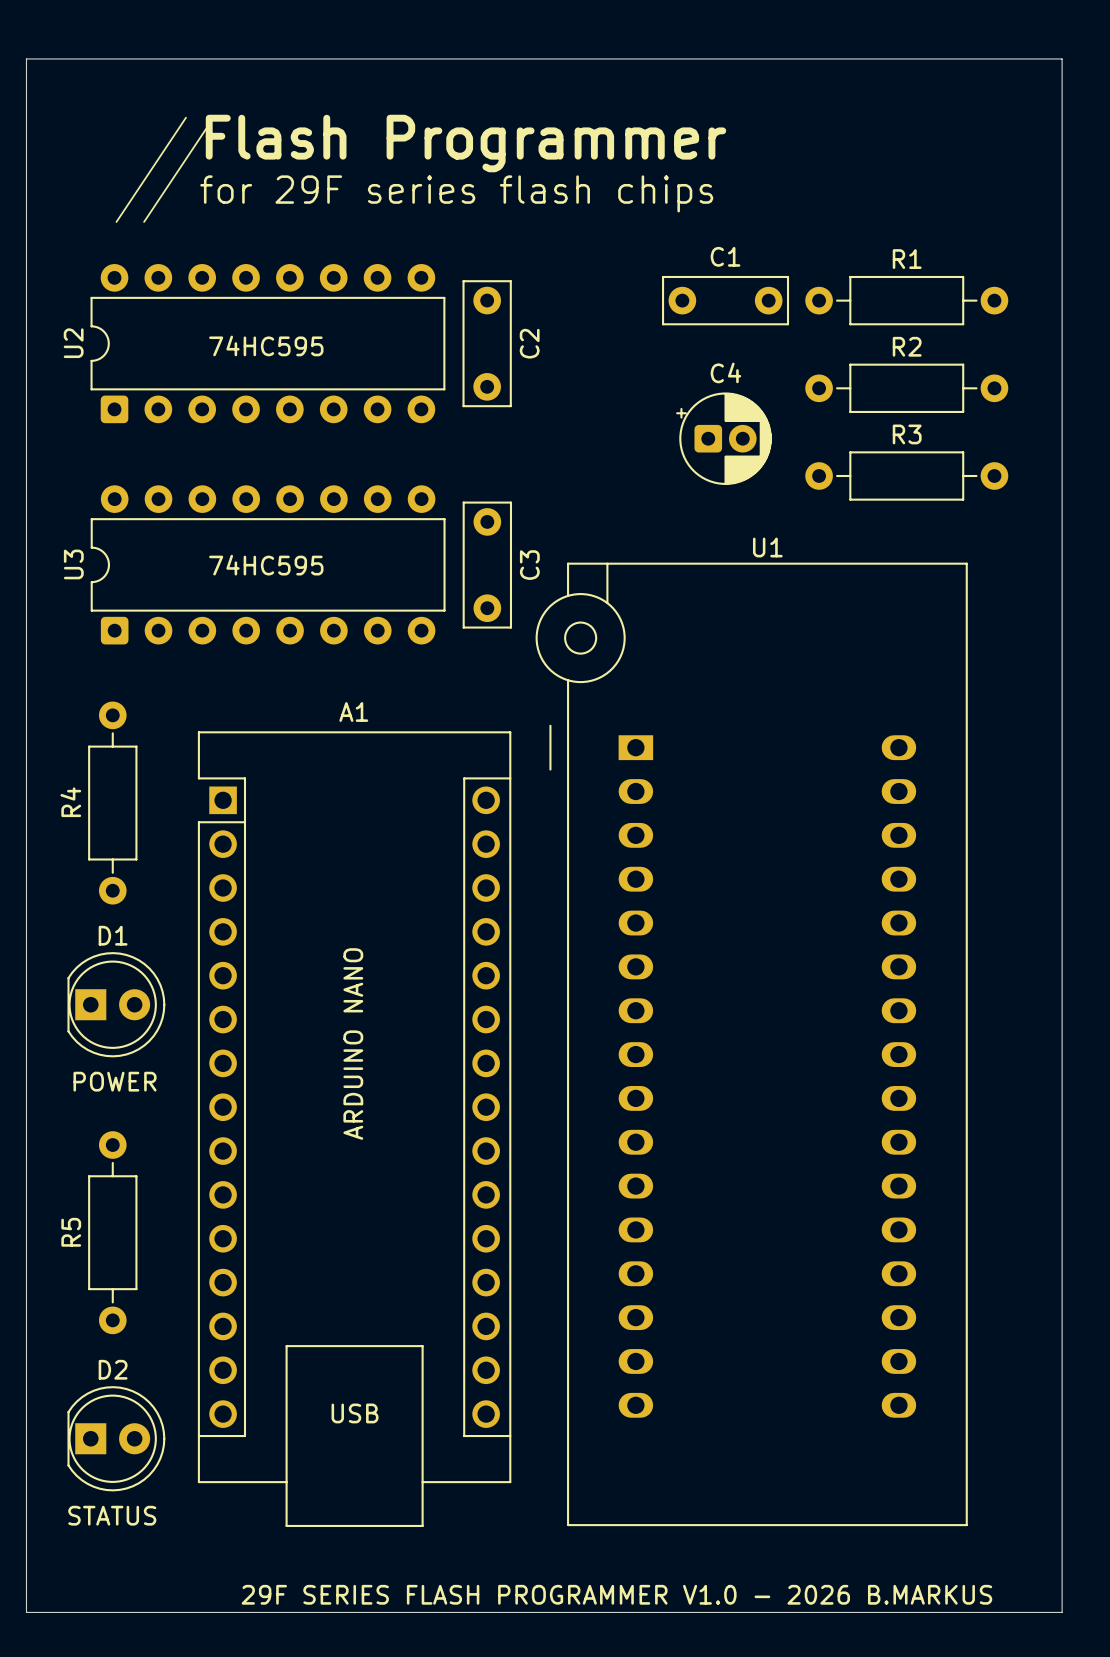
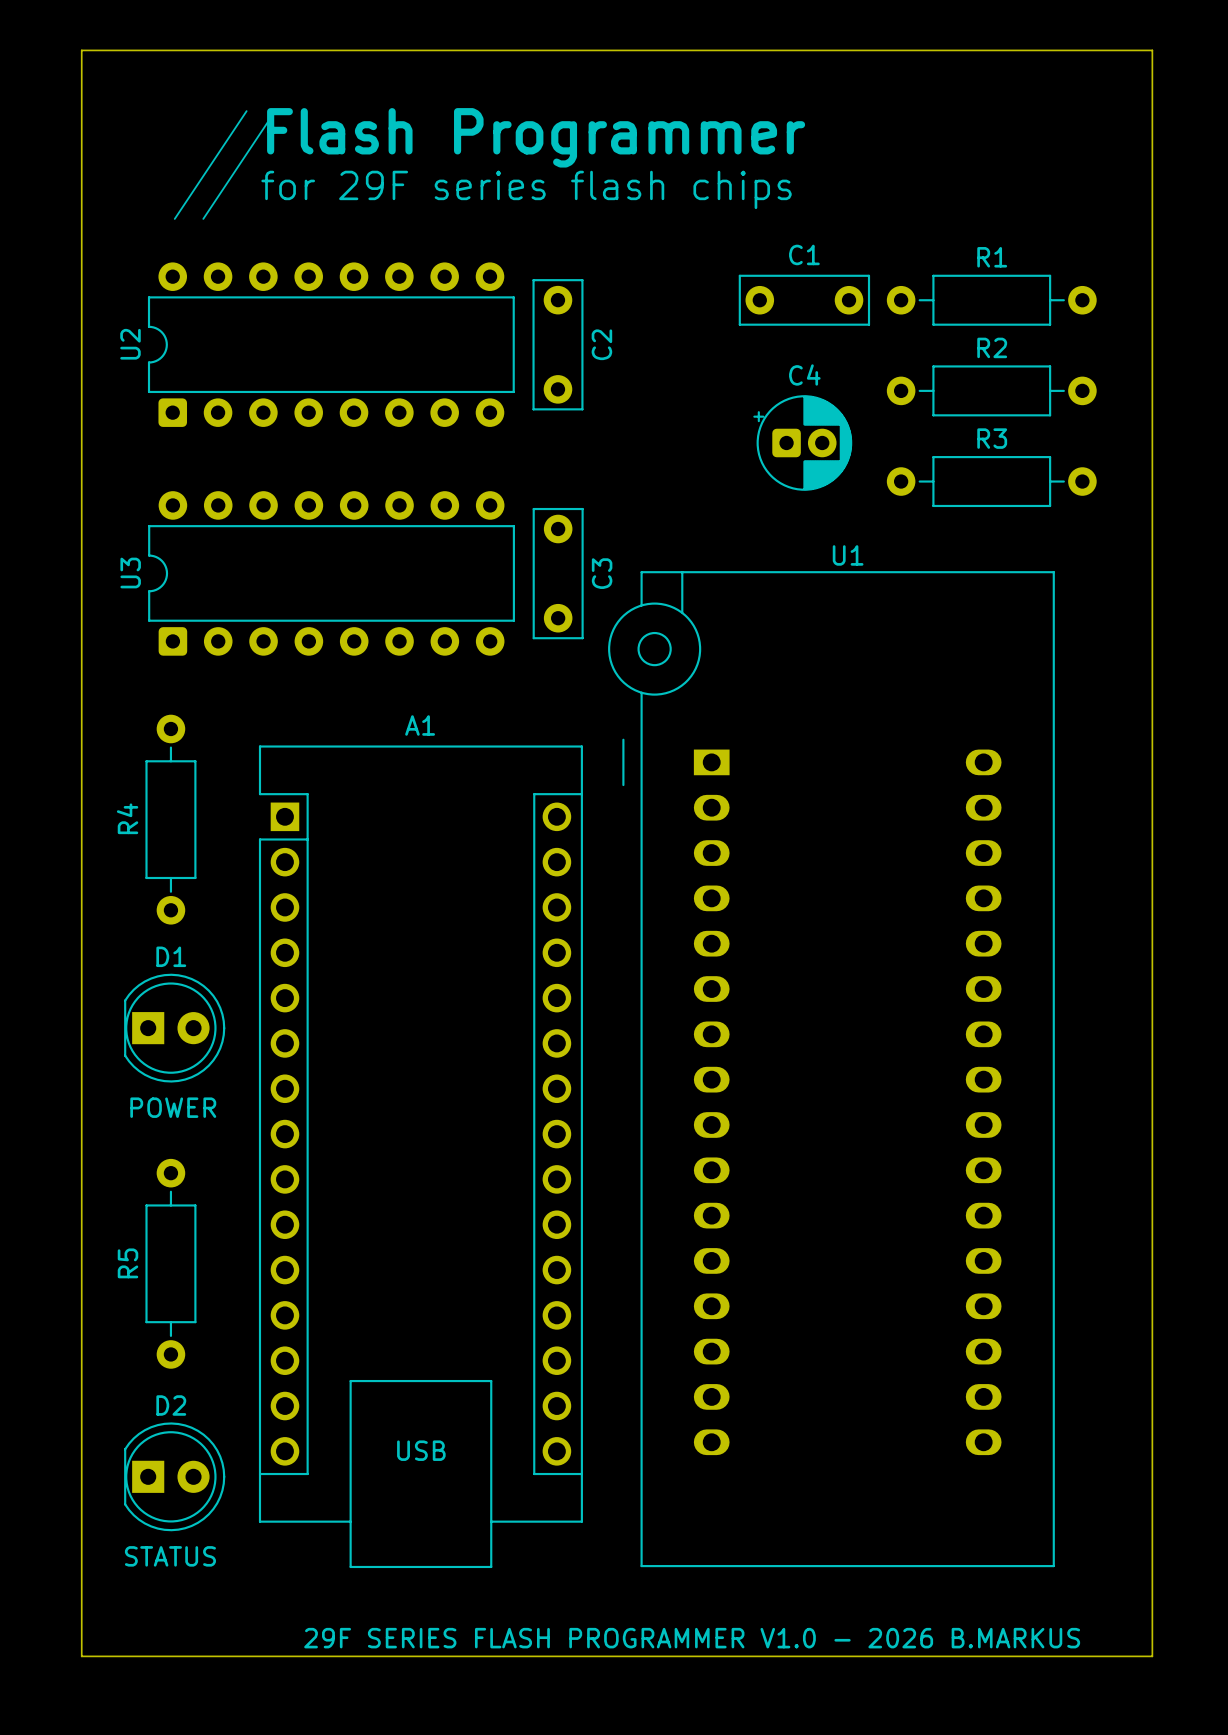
text: 74HC595 (266, 345) -> none
text: 74HC595 (266, 565) -> none
text: ARDUINO NANO (353, 1044) -> none

